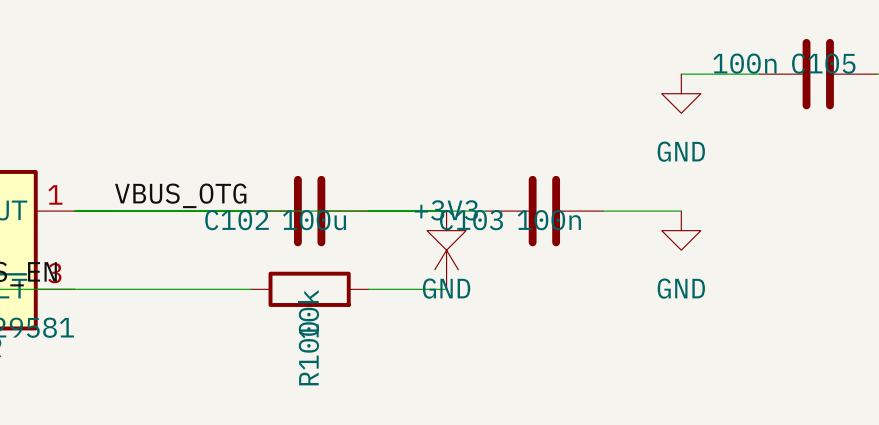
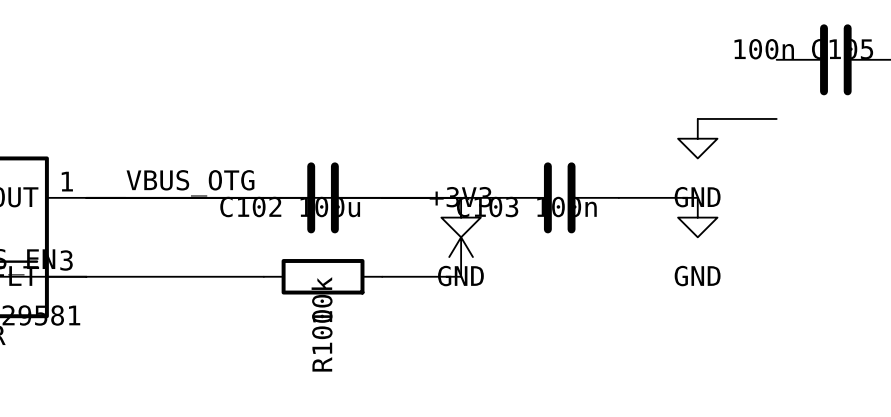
wire: (681, 74) (759, 74) -> (697, 118) (776, 118)
power symbol position: GND (681, 93) -> GND (697, 138)

